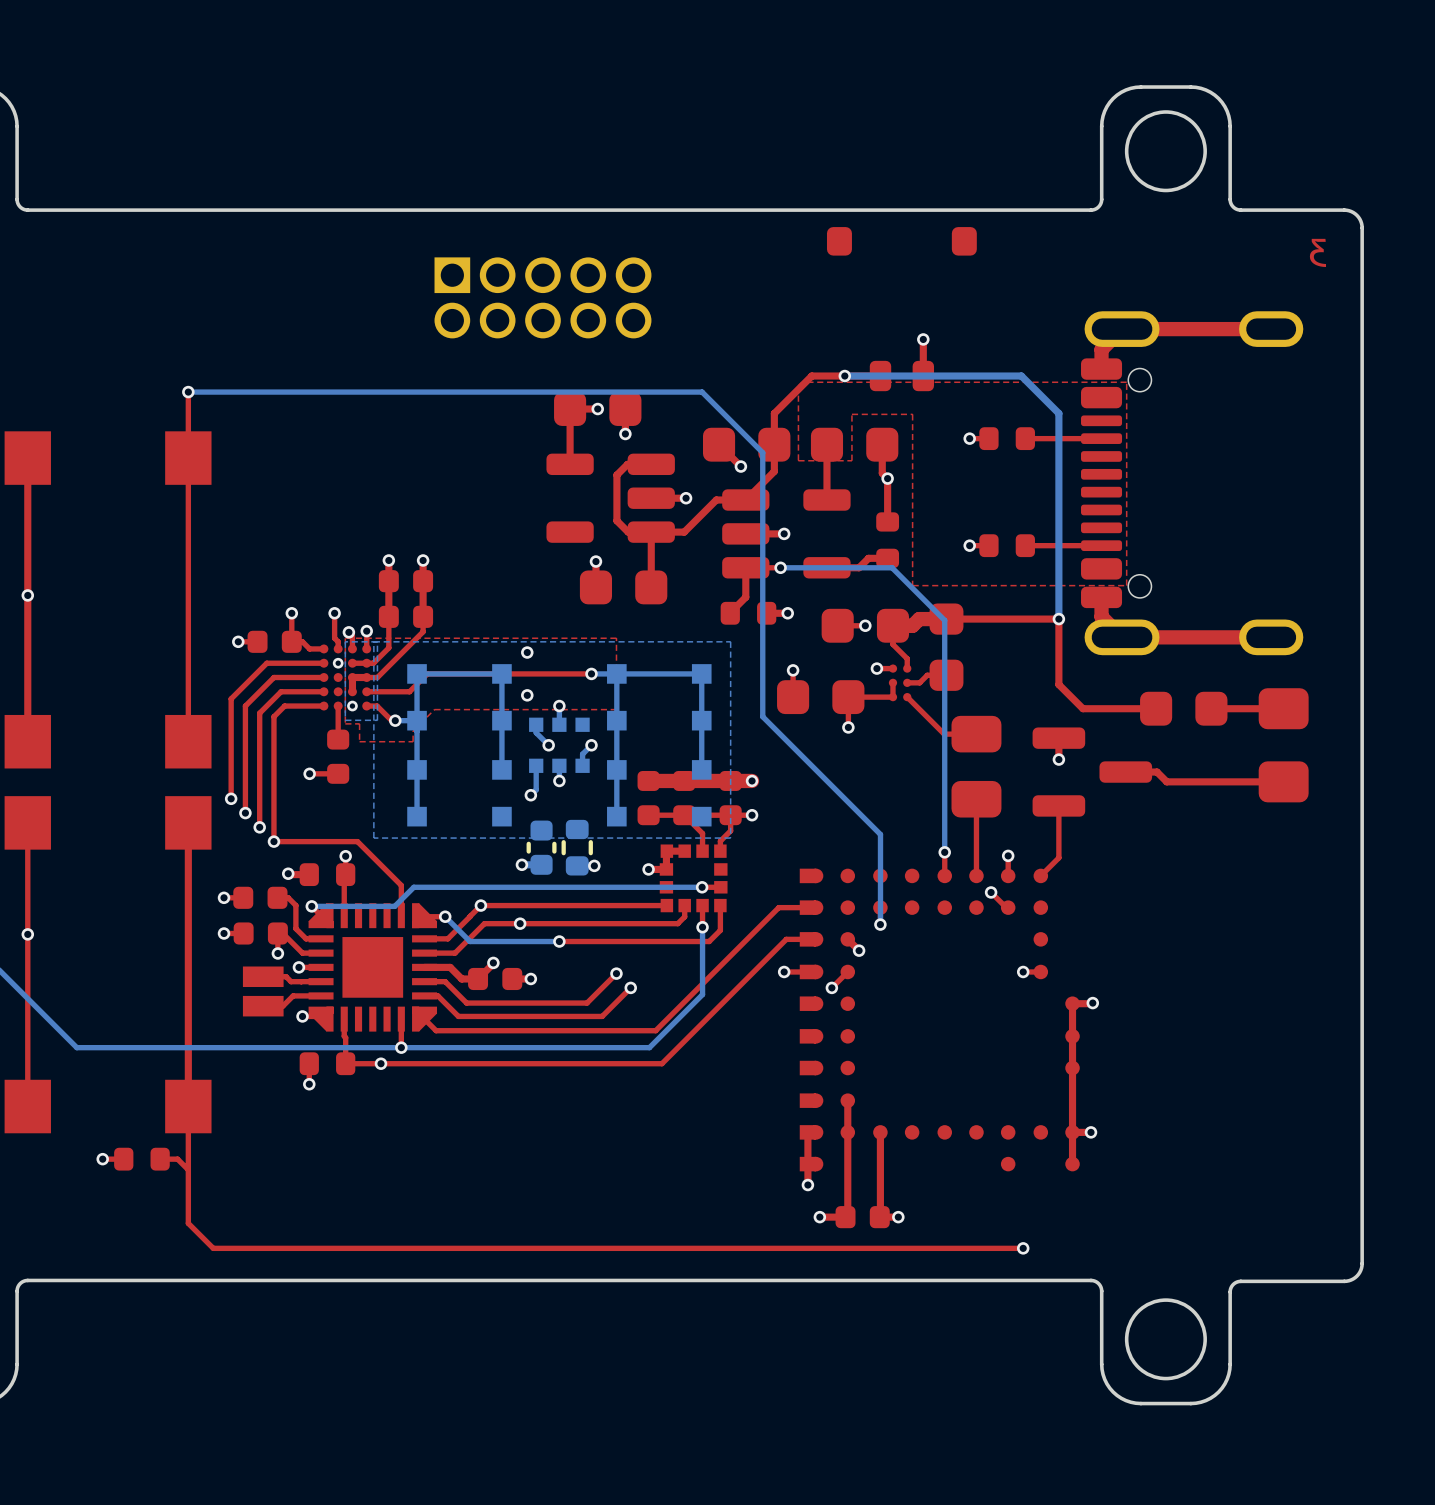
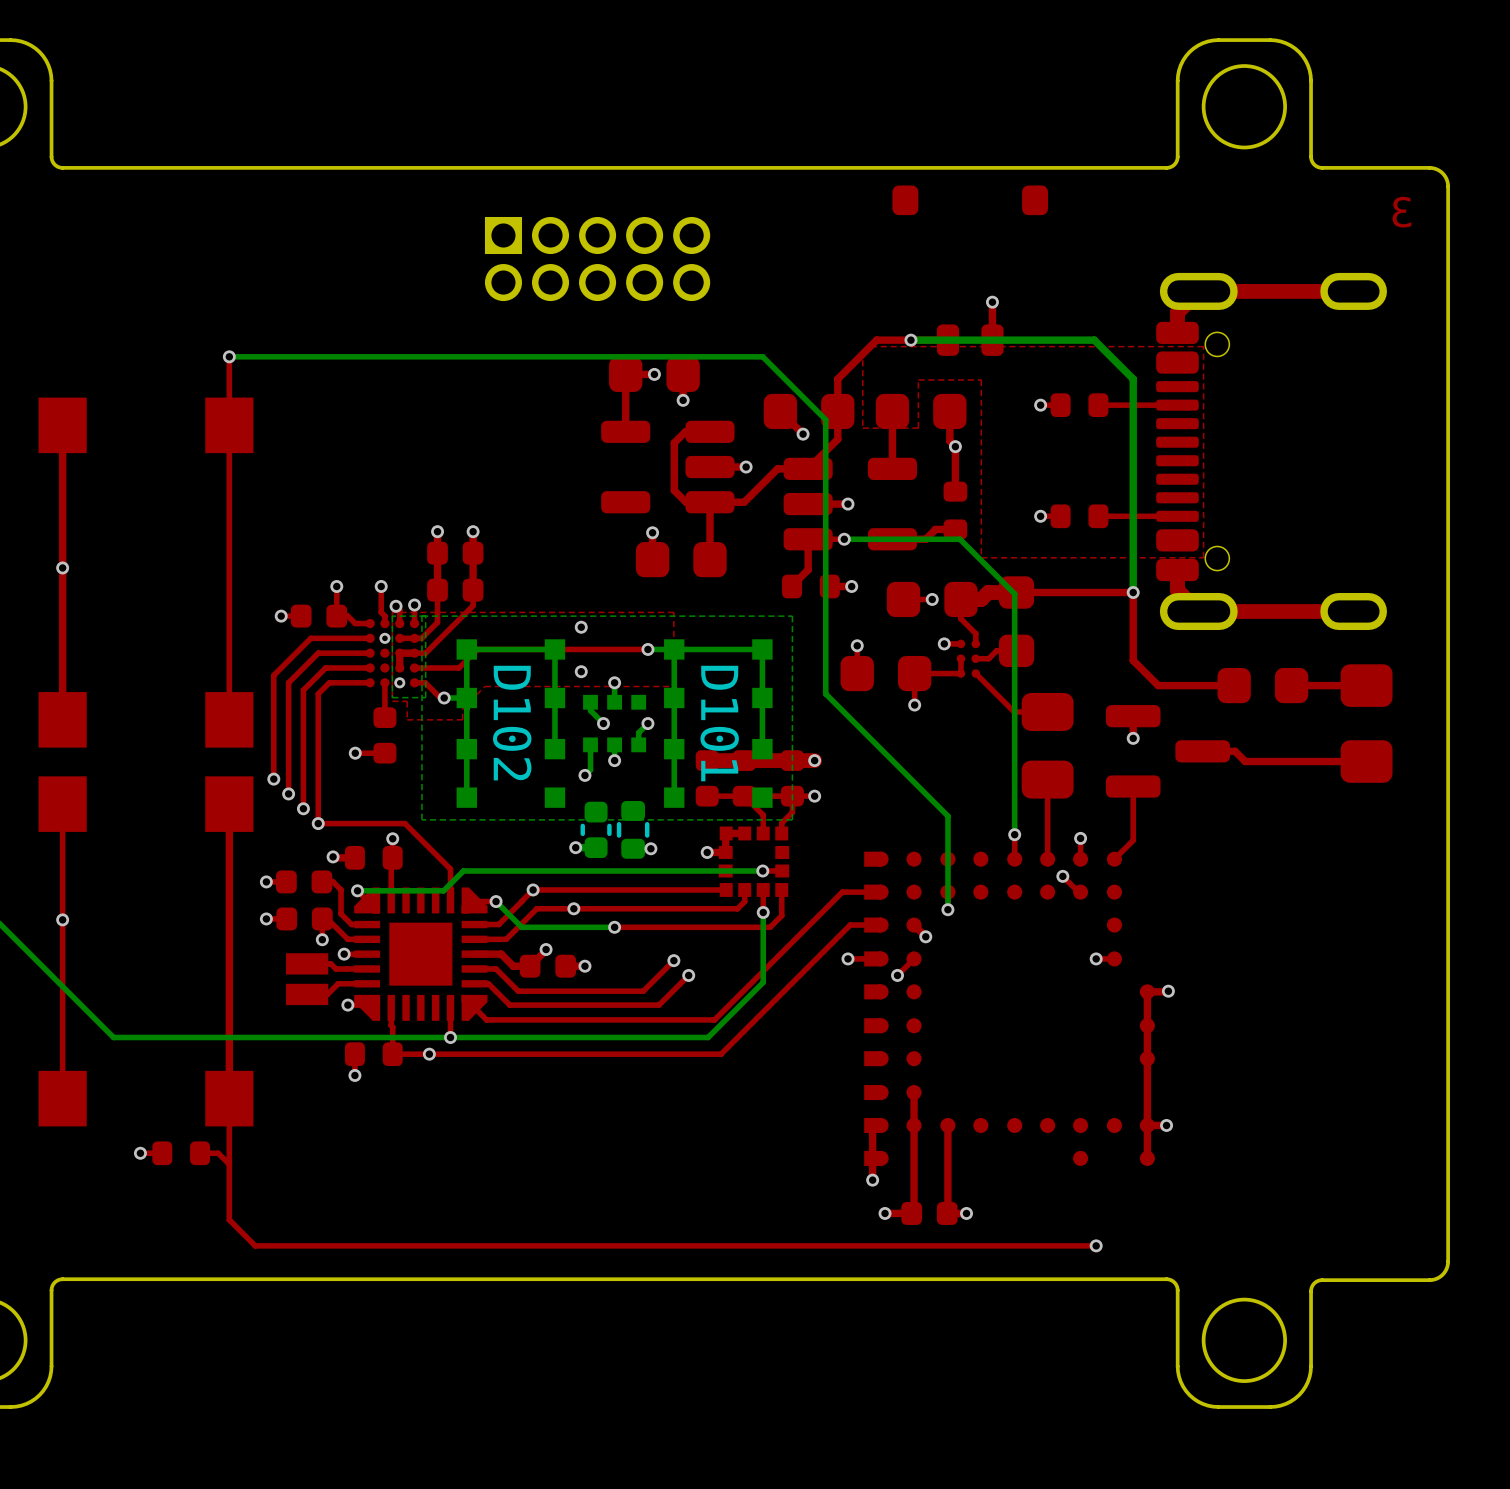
D102 name: none -> D102 (512, 723)
D101 name: none -> D101 (719, 723)

